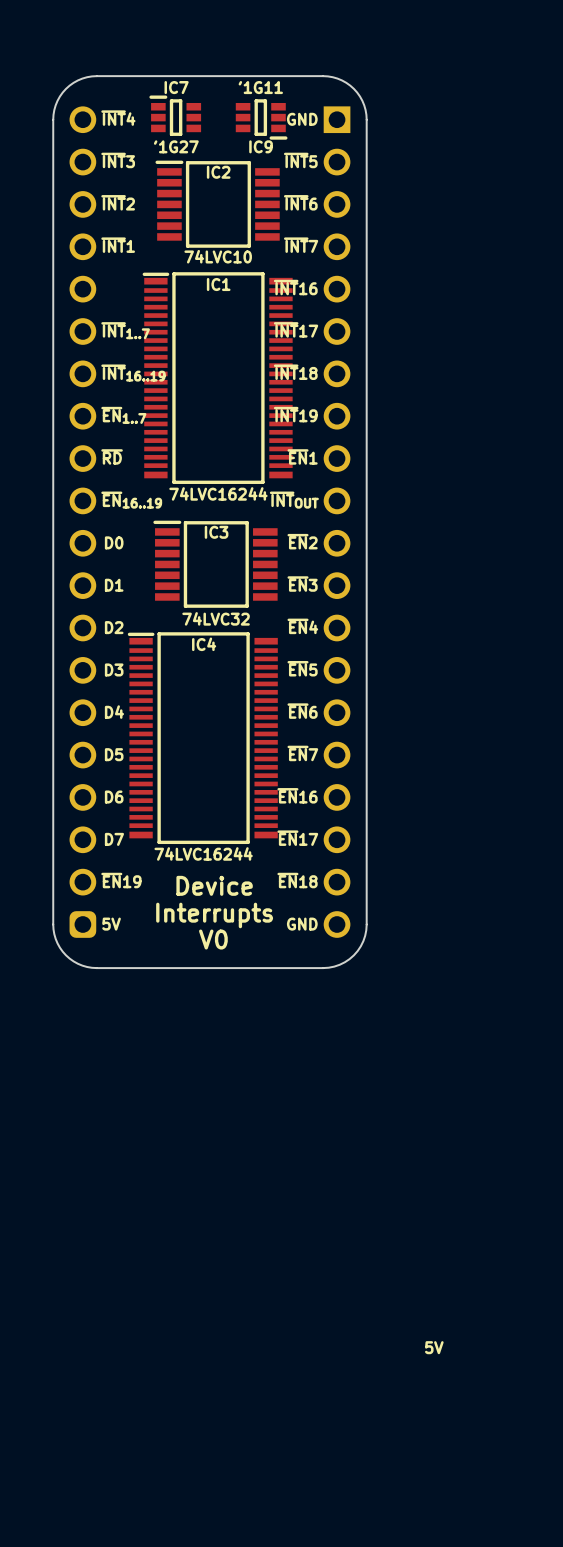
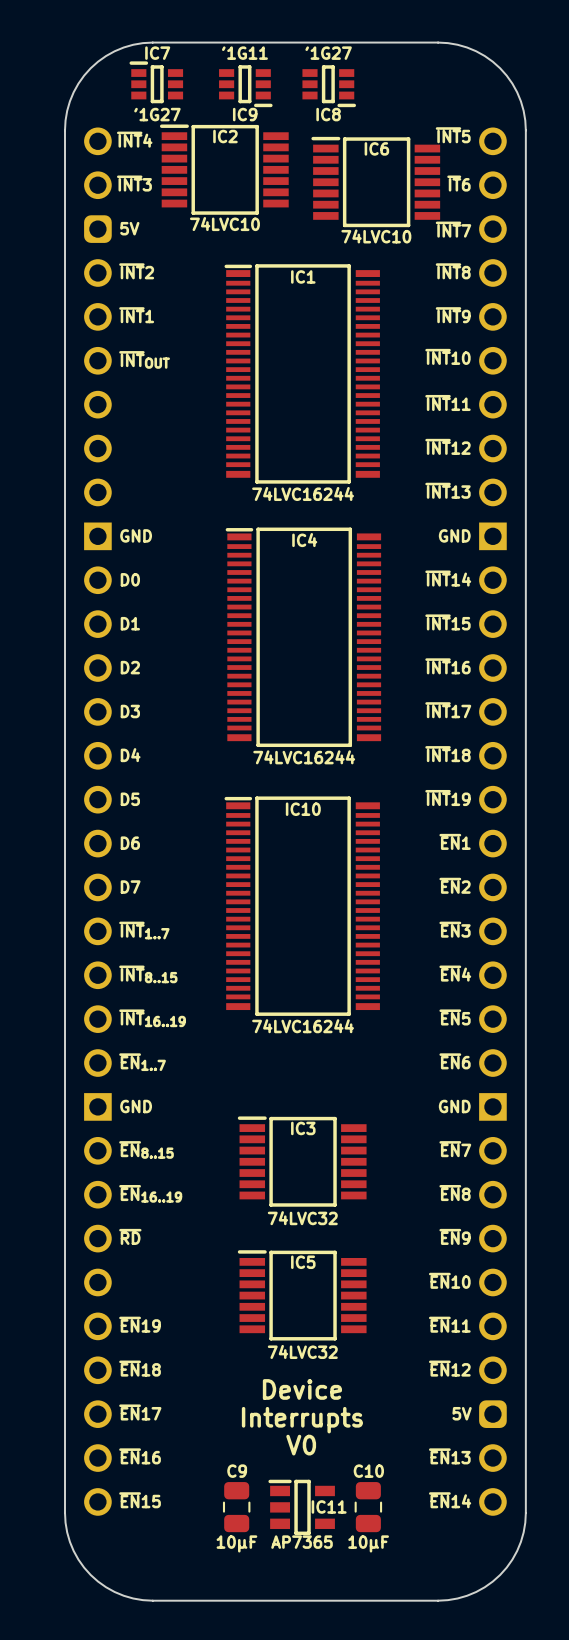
IC8: none -> (329, 86)
IC7 position: (175, 115) -> (156, 82)
IC9 position: (261, 119) -> (245, 86)
text: GND (302, 119) -> none
IC6: none -> (375, 182)
text position: ~{INT}5 (300, 160) -> ~{INT}5 (453, 135)
text: none -> ~{IT}6 (458, 183)
text position: ~{INT}2 (118, 202) -> ~{INT}2 (136, 271)
text: ~{INT}6 (300, 202) -> none
text: none -> 5V (129, 228)
IC2 position: (217, 204) -> (224, 169)
text position: ~{INT}1 (118, 245) -> ~{INT}1 (136, 315)
text position: ~{INT}7 (301, 245) -> ~{INT}7 (453, 229)
text: none -> ~{INT}8 (453, 271)
text position: ~{INT}16 (295, 287) -> ~{INT}16 (447, 666)
text: none -> ~{INT}9 (453, 315)
text: none -> ~{INT}10 (447, 356)
text position: ~{INT}17 (296, 329) -> ~{INT}17 (448, 710)
text: ~{INT}1..7 (125, 330) -> none
text position: ~{INT}18 (295, 372) -> ~{INT}18 (447, 754)
text: none -> ~{INT}11 (447, 402)
text: ~{INT}16..19 (133, 373) -> none
IC1 position: (217, 378) -> (302, 373)
text position: ~{INT}19 (295, 414) -> ~{INT}19 (447, 798)
text: none -> ~{INT}12 (447, 446)
text: ~{EN}1..7 (123, 415) -> none
text: ~{RD} (112, 456) -> none
text position: ~{EN}1 (302, 456) -> ~{EN}1 (455, 841)
text: none -> ~{INT}13 (447, 490)
text: ~{EN}16..19 (131, 500) -> GND (136, 535)
text position: ~{INT}OUT (294, 500) -> ~{INT}OUT (144, 359)
text: none -> GND (454, 535)
part: (209, 522) -> none
text position: ~{EN}2 (302, 541) -> ~{EN}2 (455, 885)
text: none -> ~{INT}14 (448, 578)
IC3 position: (215, 564) -> (302, 1161)
text position: ~{EN}3 (302, 584) -> ~{EN}3 (455, 929)
text: none -> ~{INT}15 (447, 622)
text position: ~{EN}4 (302, 626) -> ~{EN}4 (455, 973)
text position: ~{EN}5 (302, 668) -> ~{EN}5 (455, 1017)
text position: ~{EN}6 (302, 711) -> ~{EN}6 (455, 1061)
IC4 position: (202, 738) -> (303, 637)
text position: ~{EN}7 (302, 753) -> ~{EN}7 (455, 1149)
part: none -> (295, 821)
text: ~{EN}16 (297, 795) -> none
text: ~{EN}17 (297, 838) -> none
IC10: none -> (302, 906)
text position: ~{EN}19 (121, 880) -> ~{EN}19 (140, 1324)
text: ~{EN}18 (297, 880) -> none
text: none -> ~{INT}1..7 (144, 930)
text: Device (214, 885) -> none
text: Interrupts (214, 915) -> none
text: 5V (111, 924) -> ~{INT}8..15 (148, 974)
text: GND (302, 924) -> none
text: V0 (213, 939) -> none
text: none -> ~{INT}16..19 (152, 1018)
text: none -> ~{EN}1..7 (142, 1062)
text: none -> GND (136, 1106)
text: none -> GND (454, 1106)
text: none -> ~{EN}8..15 (146, 1149)
text: none -> ~{EN}8 (455, 1193)
text: none -> ~{EN}16..19 (150, 1193)
text: none -> ~{RD} (130, 1236)
text: none -> ~{EN}9 (455, 1236)
text: none -> ~{EN}10 (449, 1280)
IC5: none -> (302, 1295)
text: none -> ~{EN}11 (449, 1324)
text: none -> ~{EN}18 (140, 1368)
text: none -> ~{EN}12 (449, 1368)
text: none -> Device (302, 1389)
text: none -> ~{EN}17 (140, 1412)
text: none -> Interrupts (302, 1420)
text: none -> V0 (301, 1445)
text: none -> ~{EN}16 (140, 1456)
text: none -> ~{EN}13 (449, 1456)
text: none -> ~{EN}15 (140, 1500)
text: none -> ~{EN}14 (450, 1500)
C9: none -> 10μF (236, 1507)
C10: none -> 10μF (368, 1507)
IC11: none -> (301, 1507)

